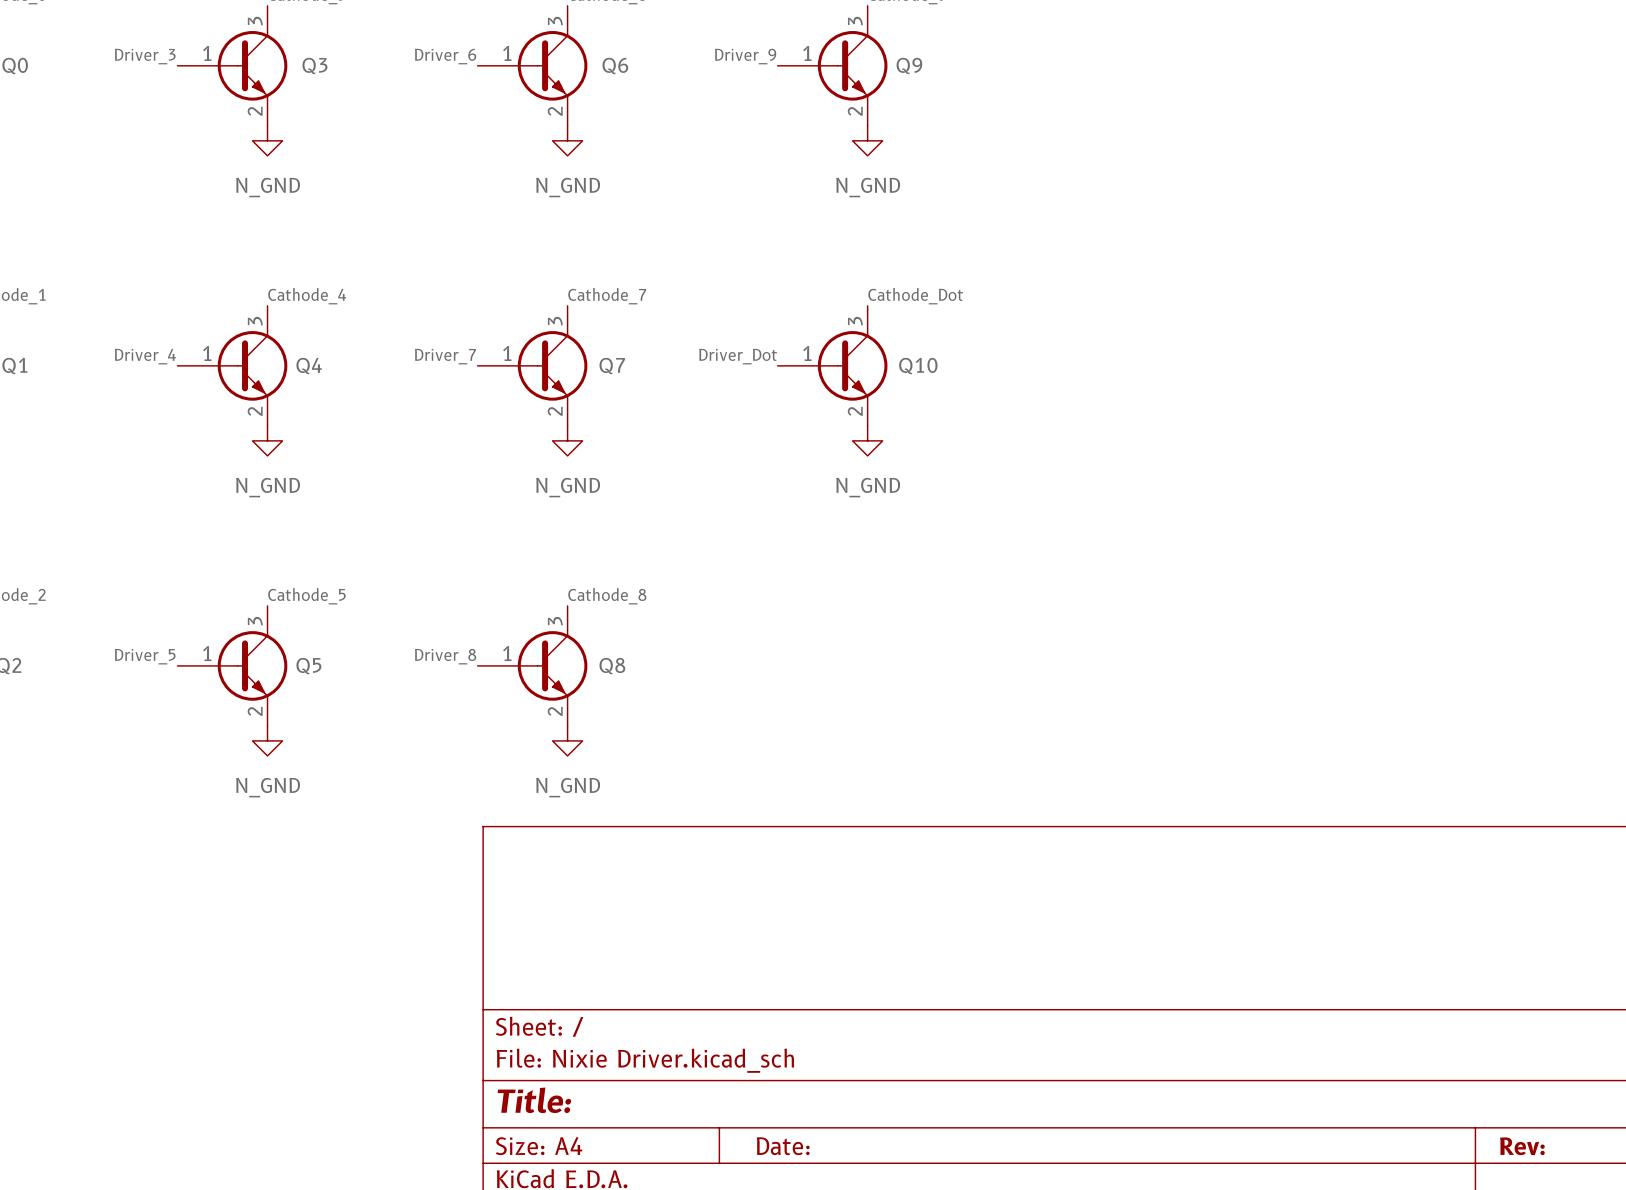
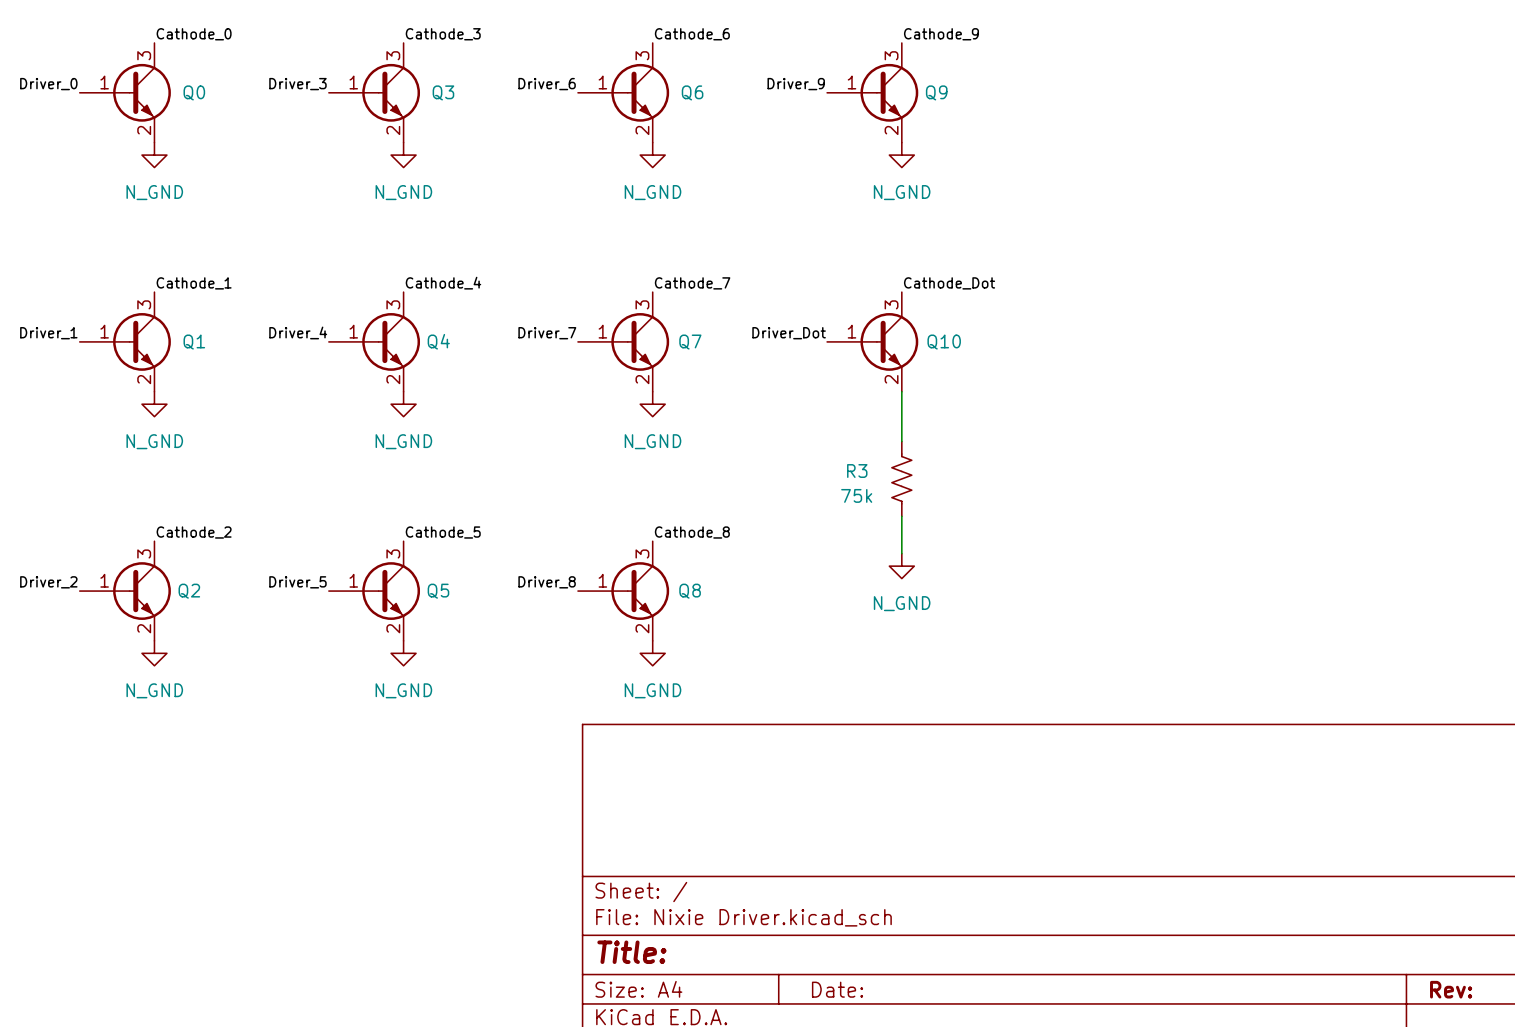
wire: none -> (901, 391) (901, 441)
power symbol position: N_GND (867, 440) -> N_GND (901, 566)
R3: none -> 75k (901, 478)
wire: none -> (901, 516) (901, 553)

